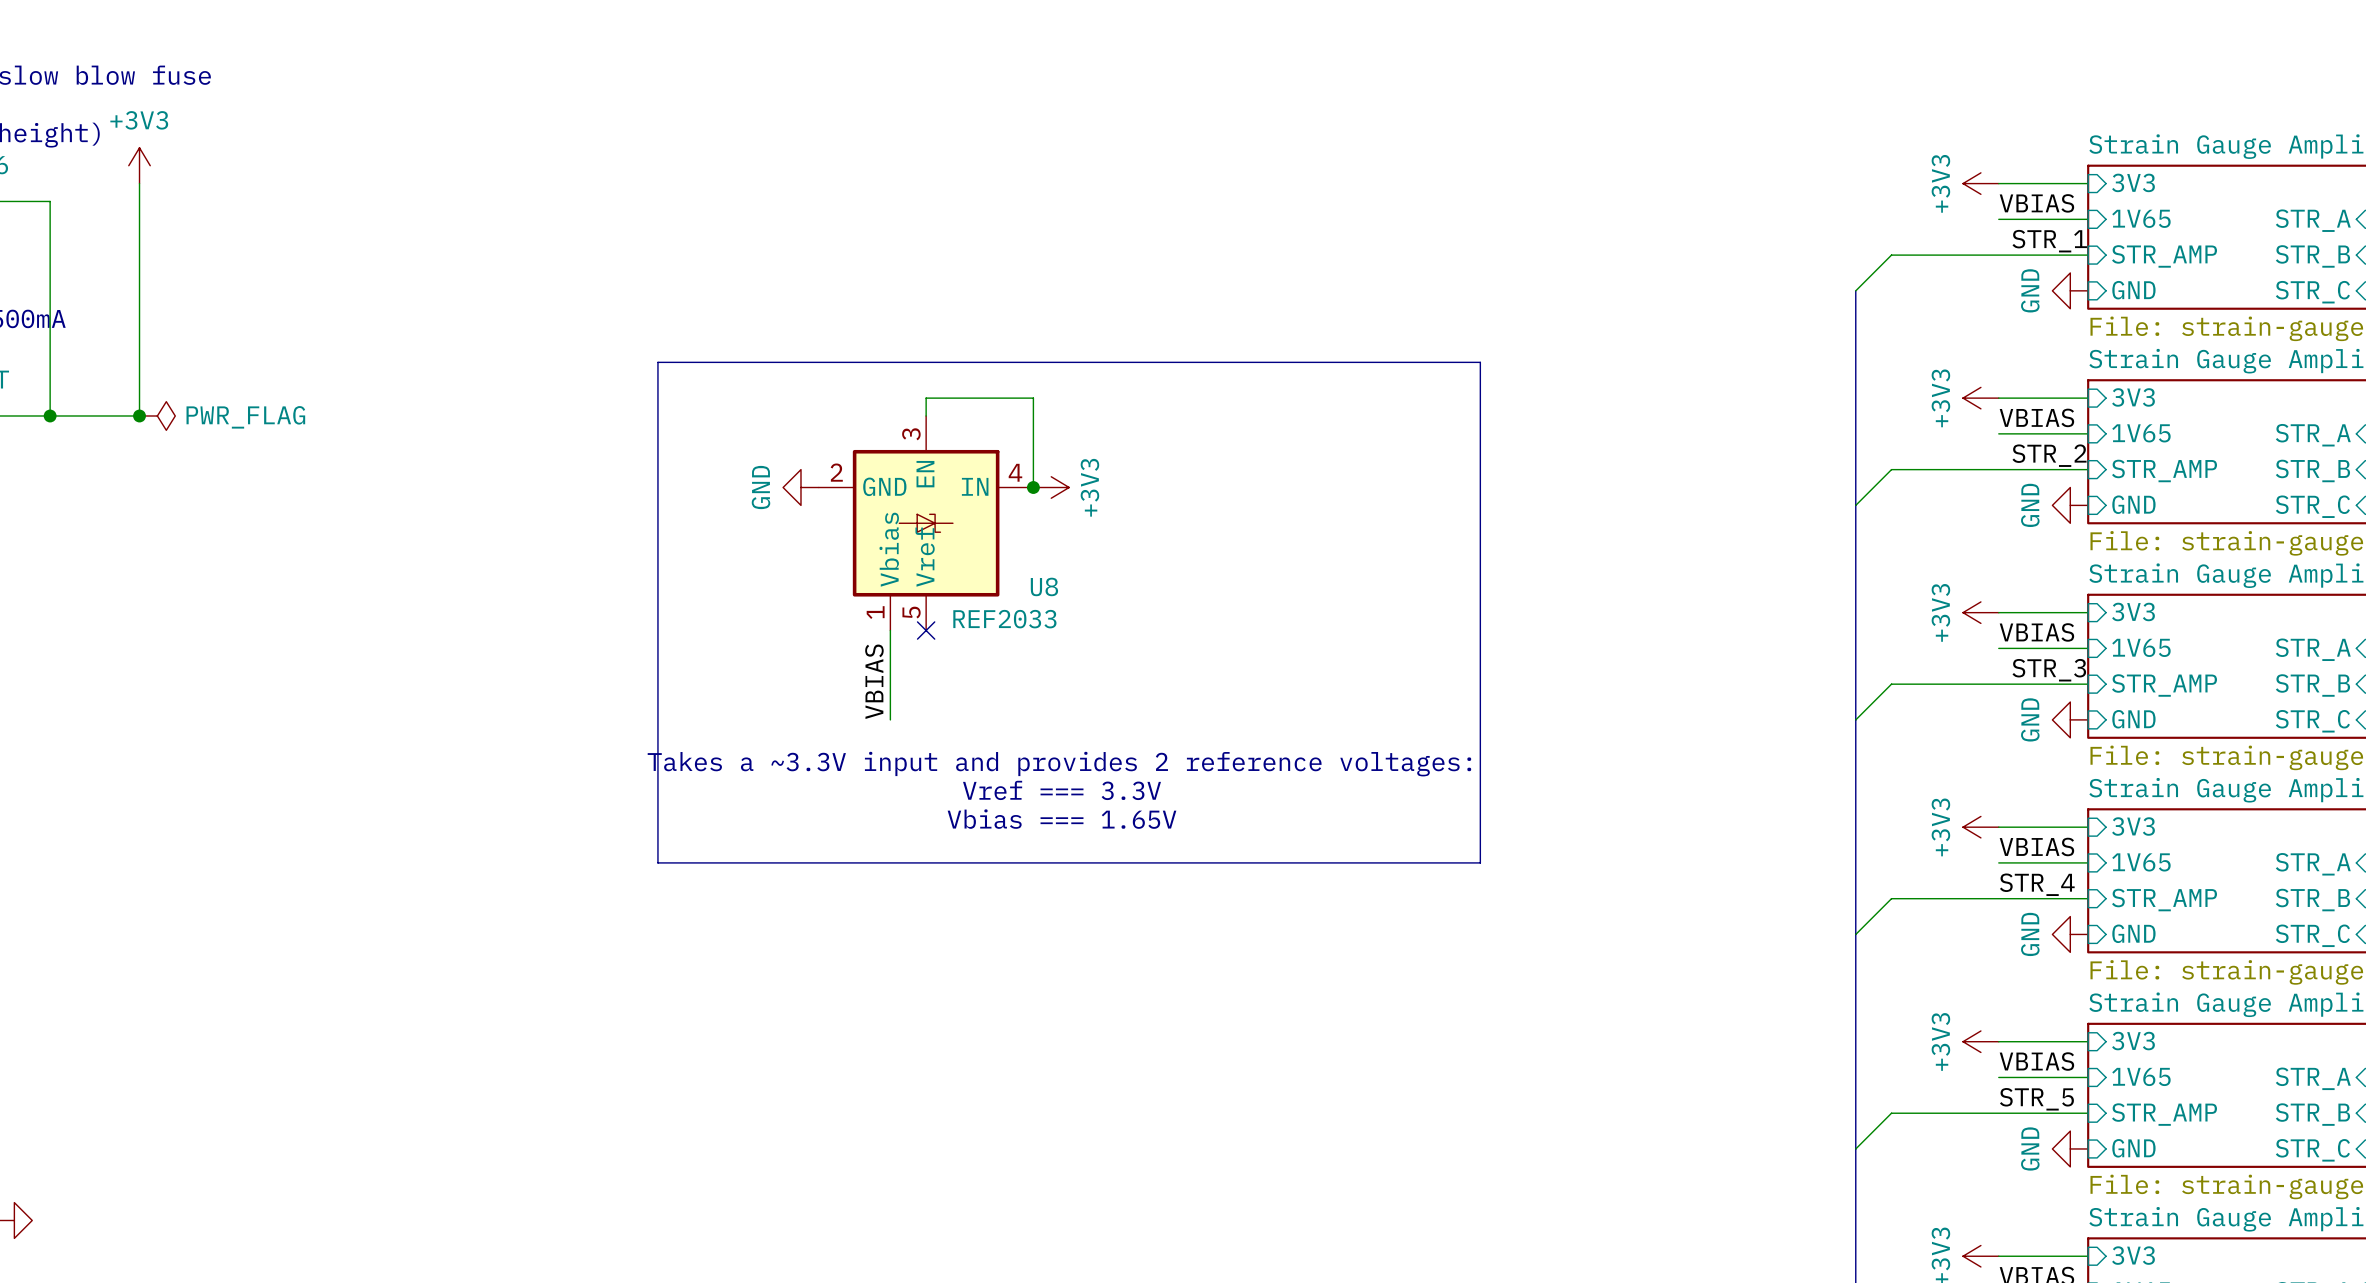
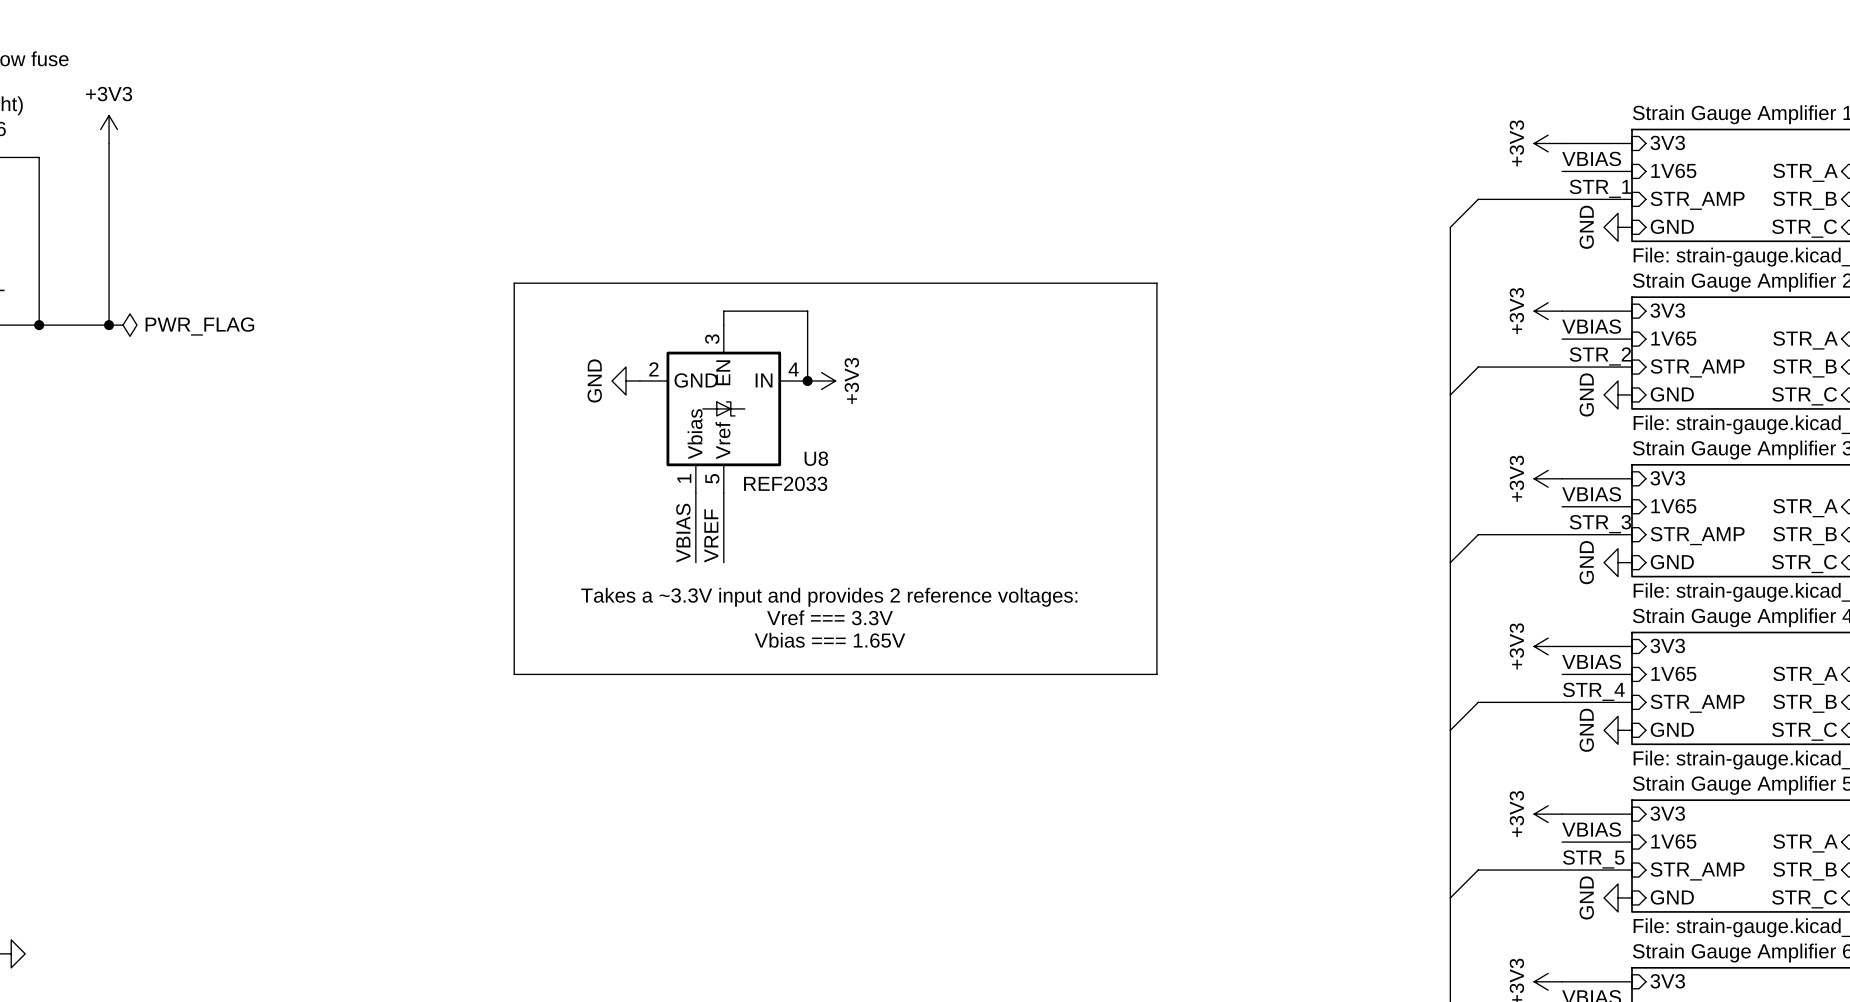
wire: none -> (723, 492) (723, 562)
no-connect mark: (926, 630) -> none
label: none -> VREF (711, 535)

